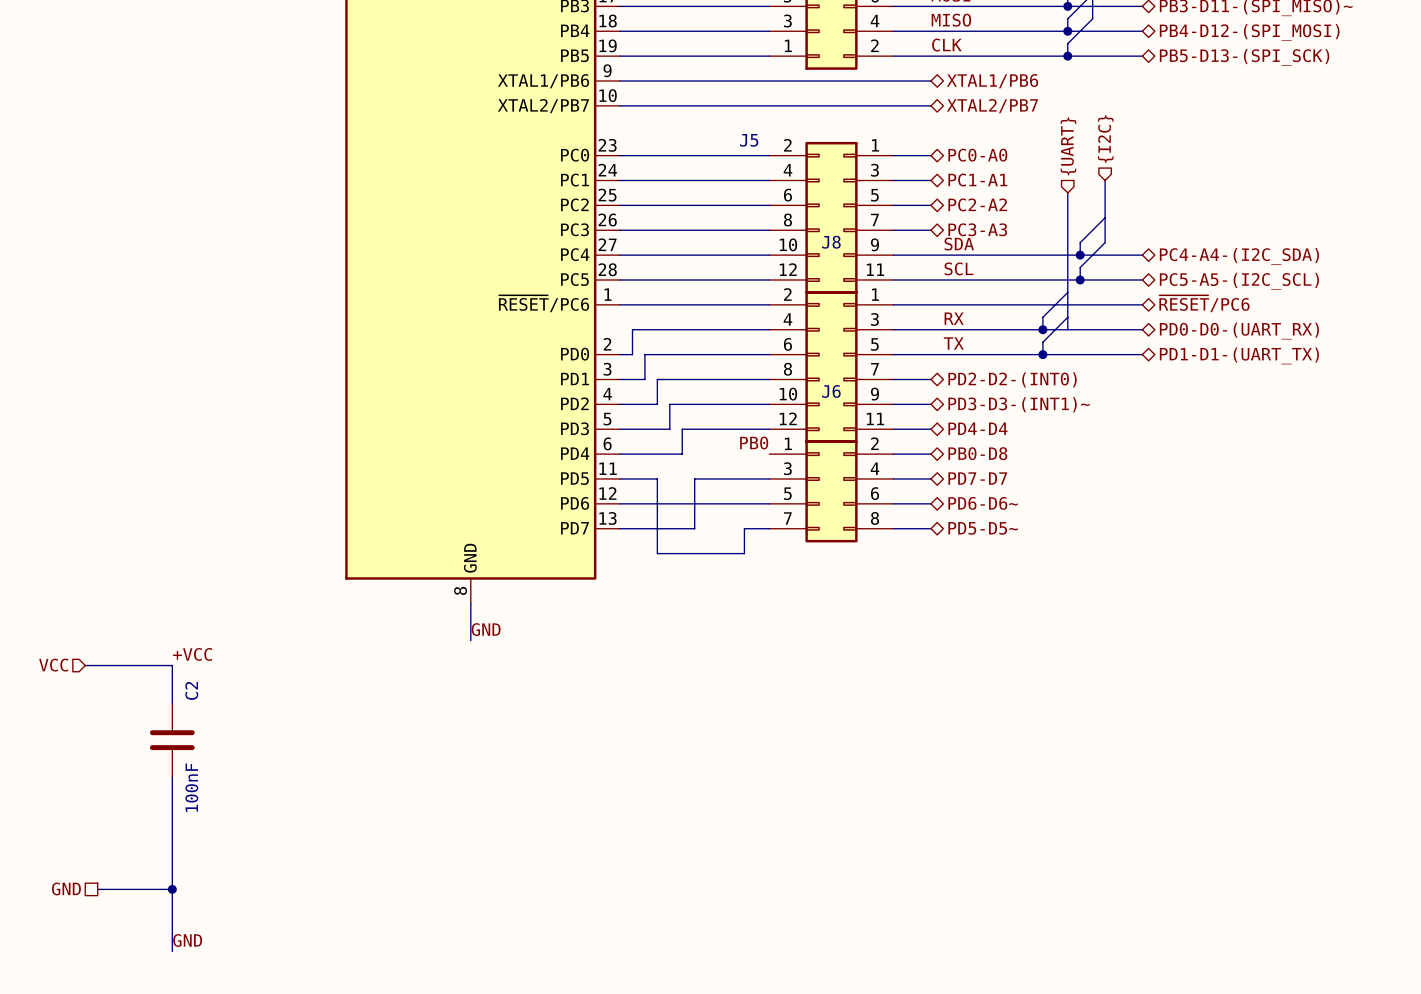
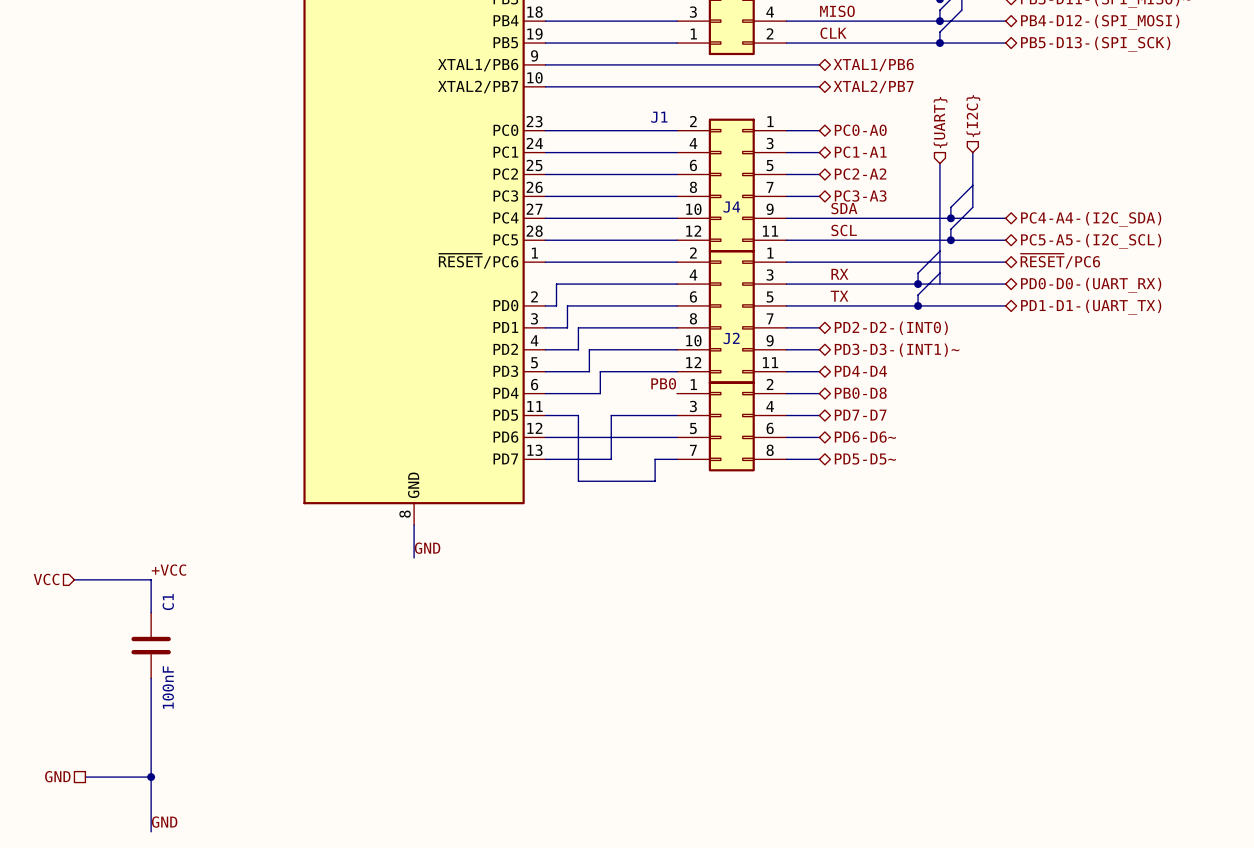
J5 name: J5 (749, 140) -> J1 (659, 117)
J8 name: J8 (831, 242) -> J4 (731, 207)
J6 name: J6 (831, 391) -> J2 (731, 338)
C2 name: C2 (191, 690) -> C1 (168, 602)

